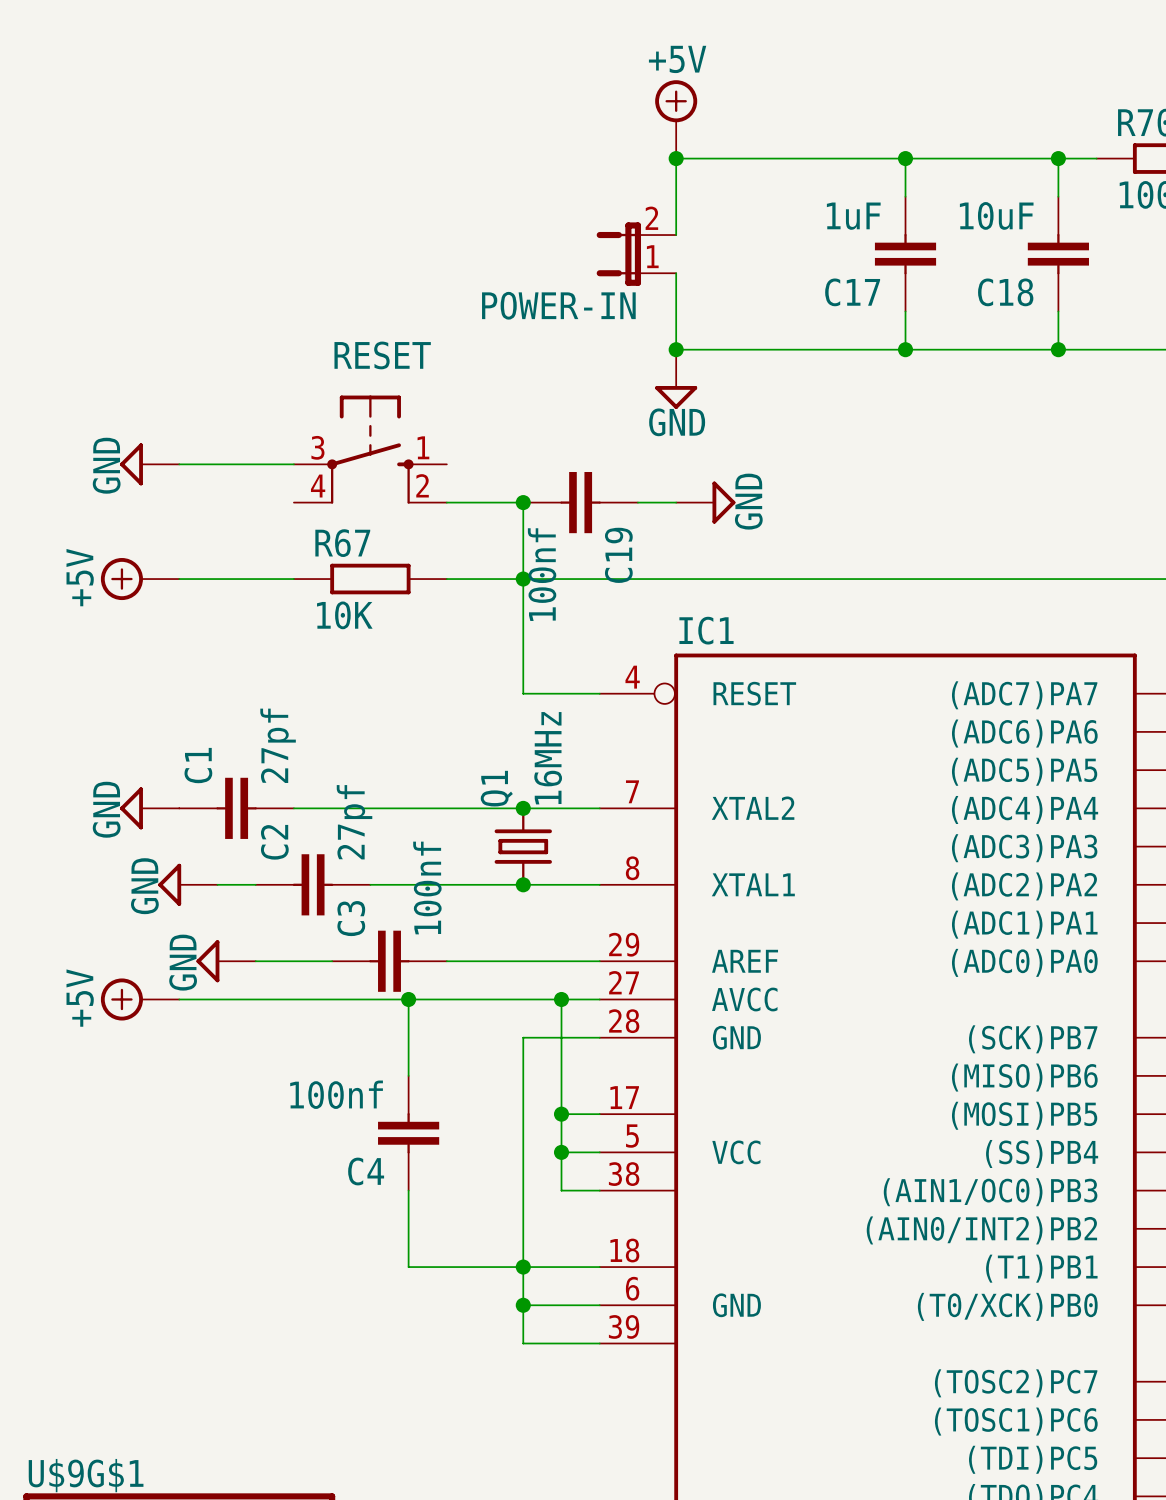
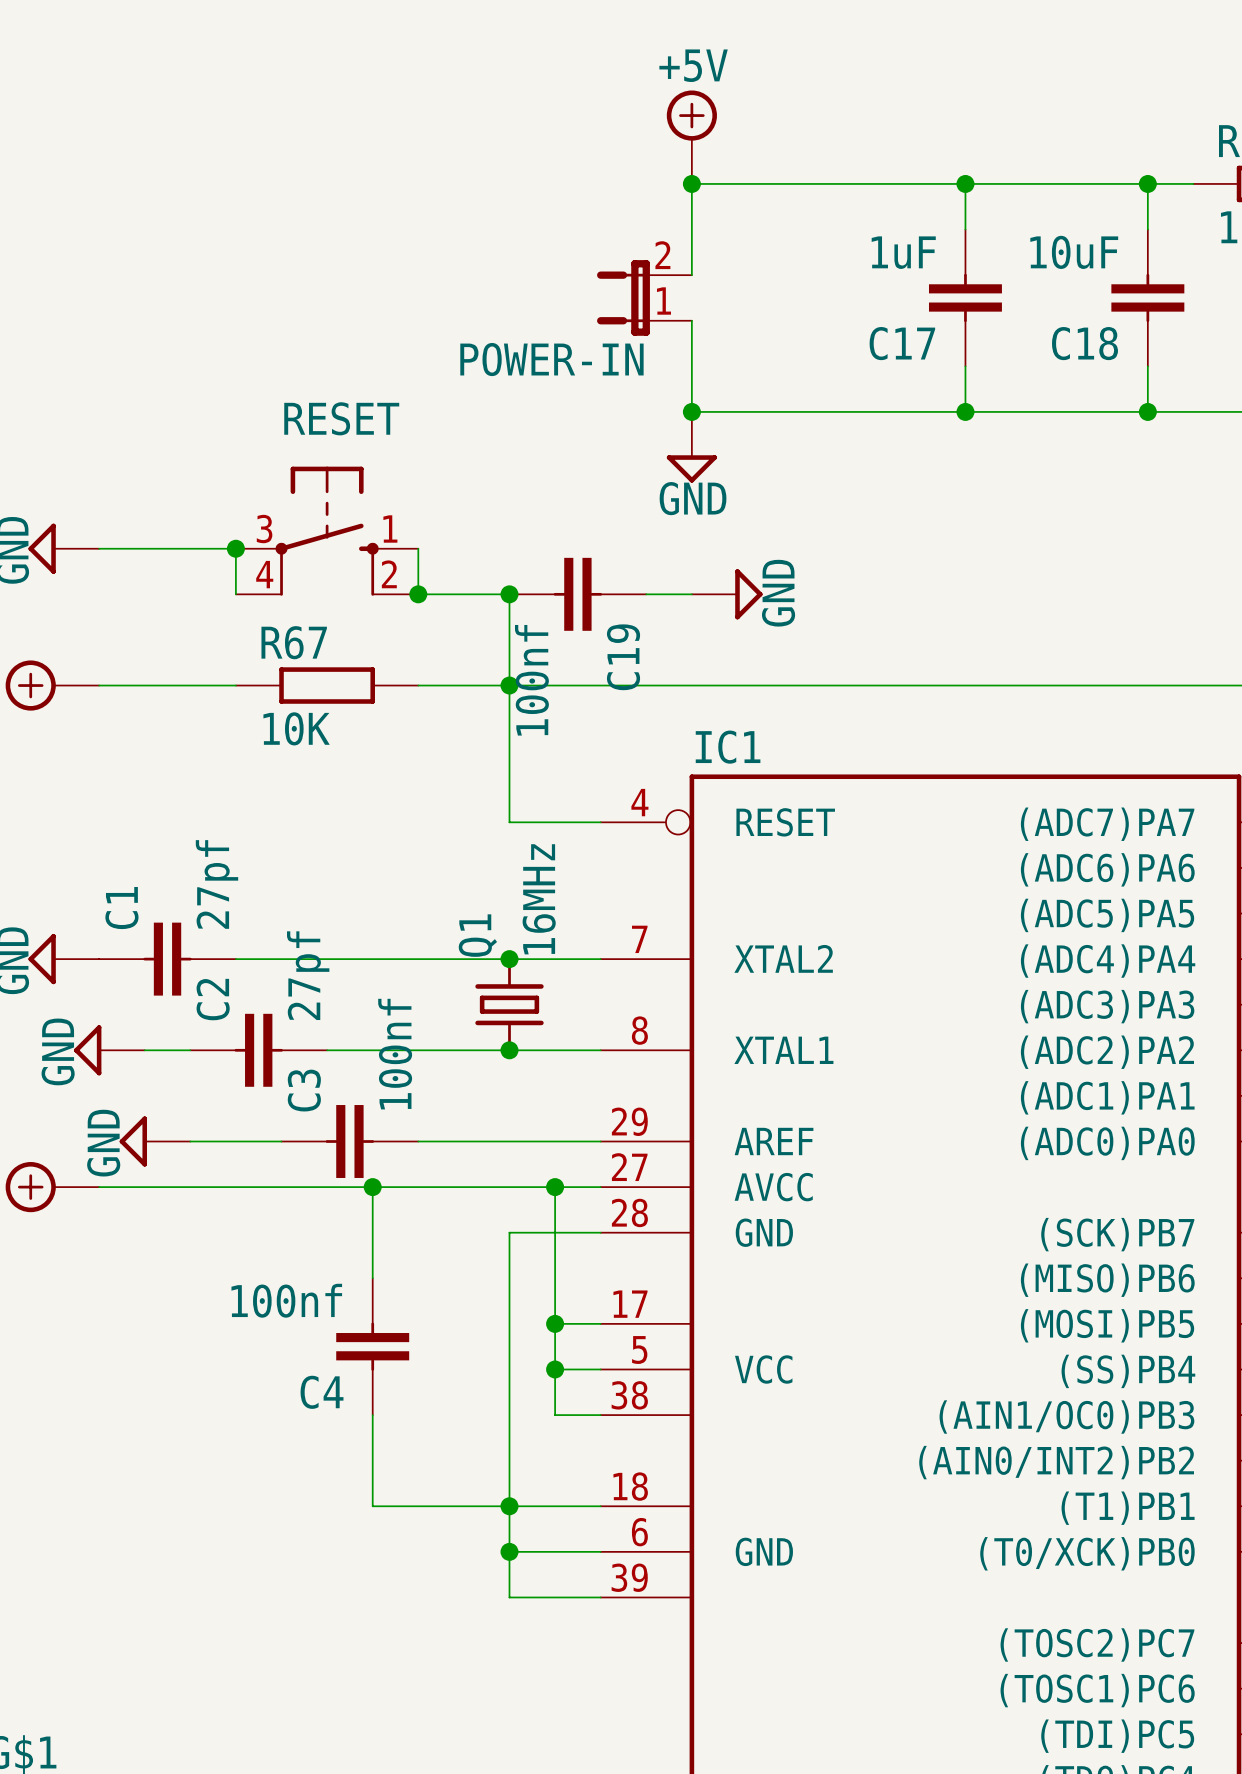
wire: none -> (235, 548) (235, 594)
junction: none -> (235, 548)
wire: none -> (418, 548) (418, 594)
junction: none -> (418, 594)

